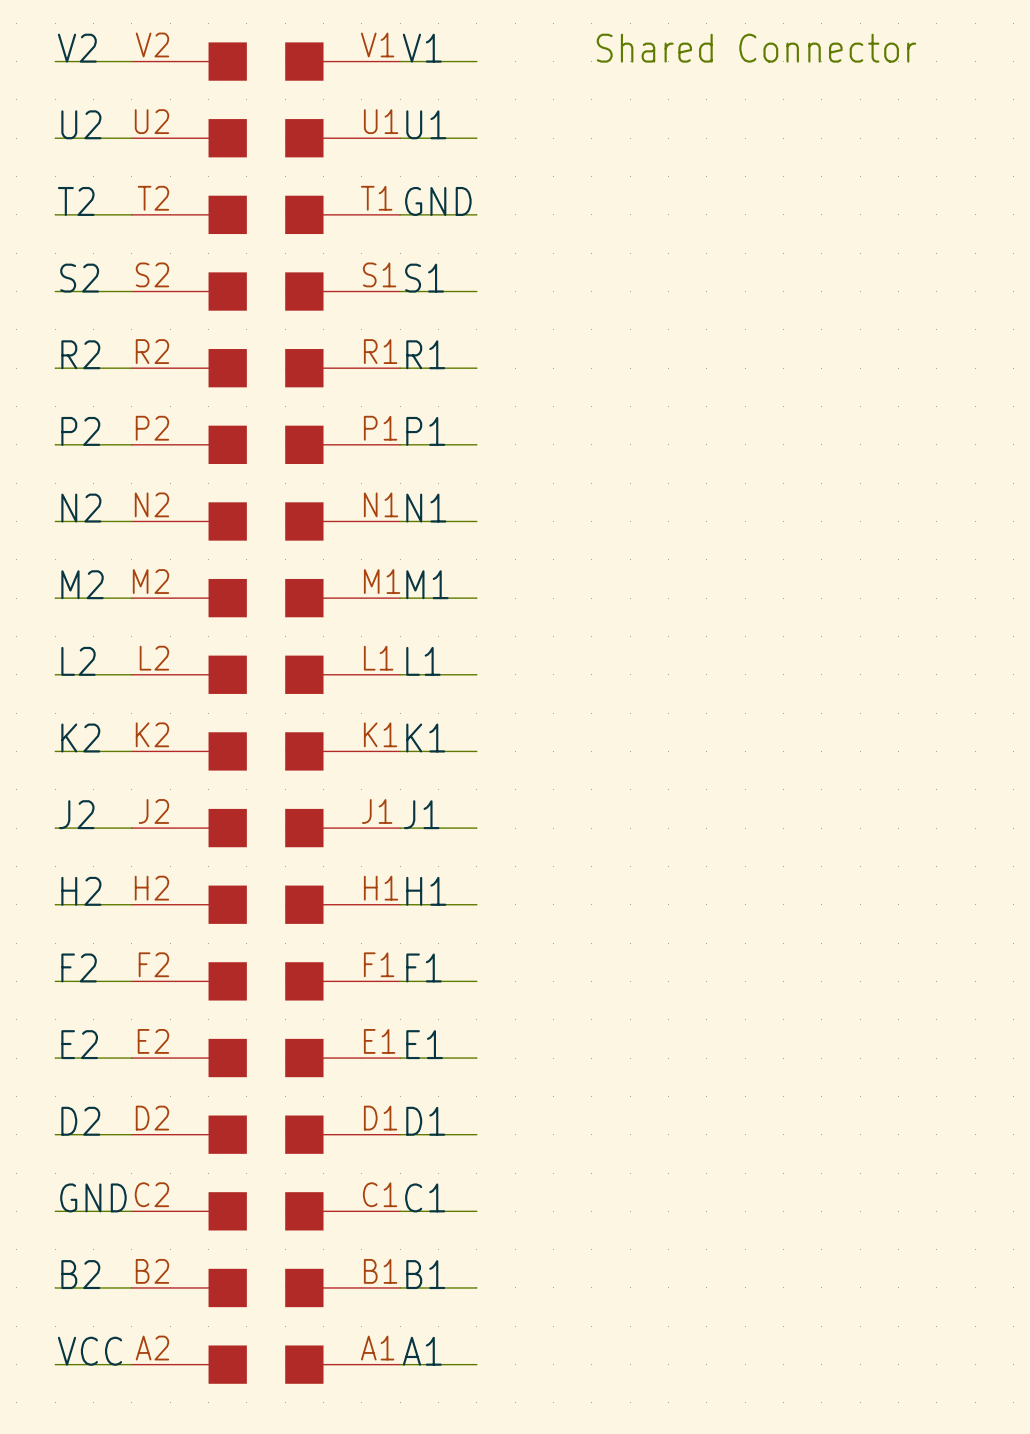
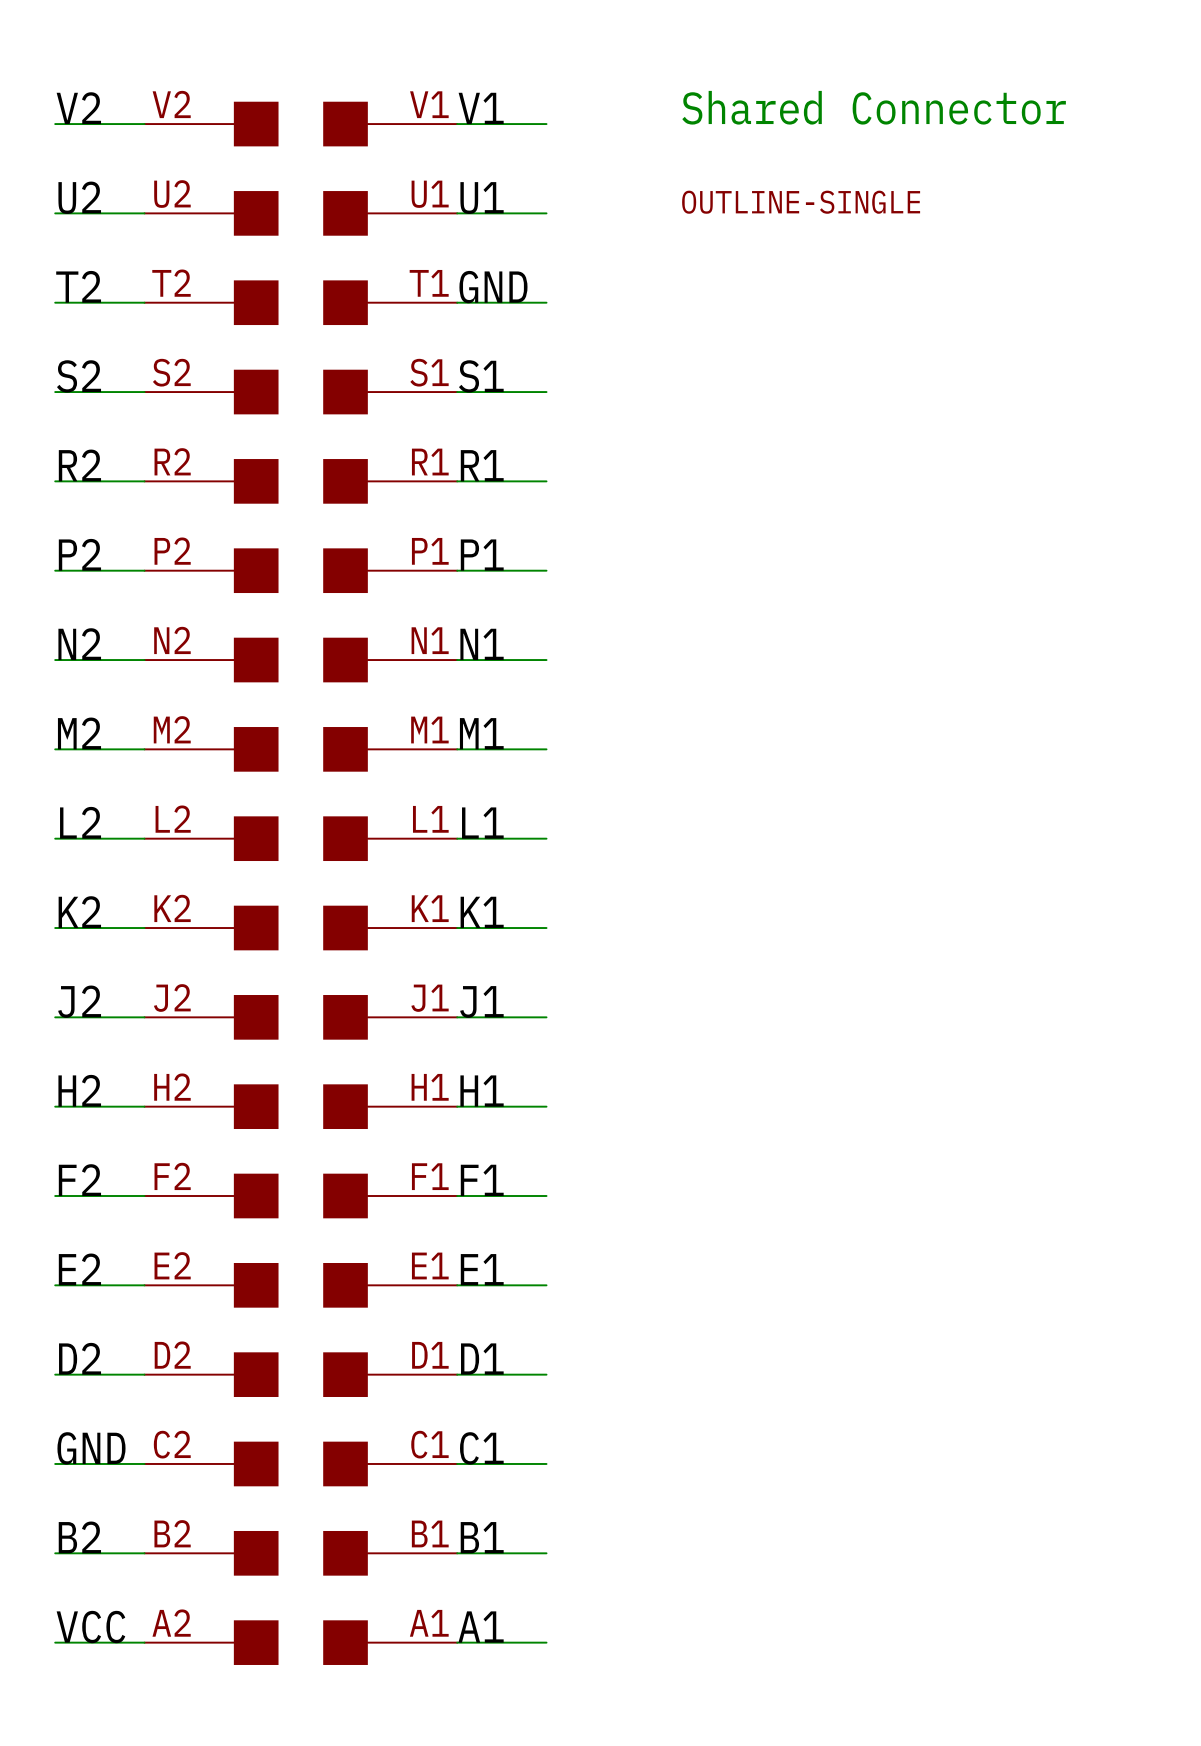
part: none -> OUTLINE-SINGLE (801, 202)

